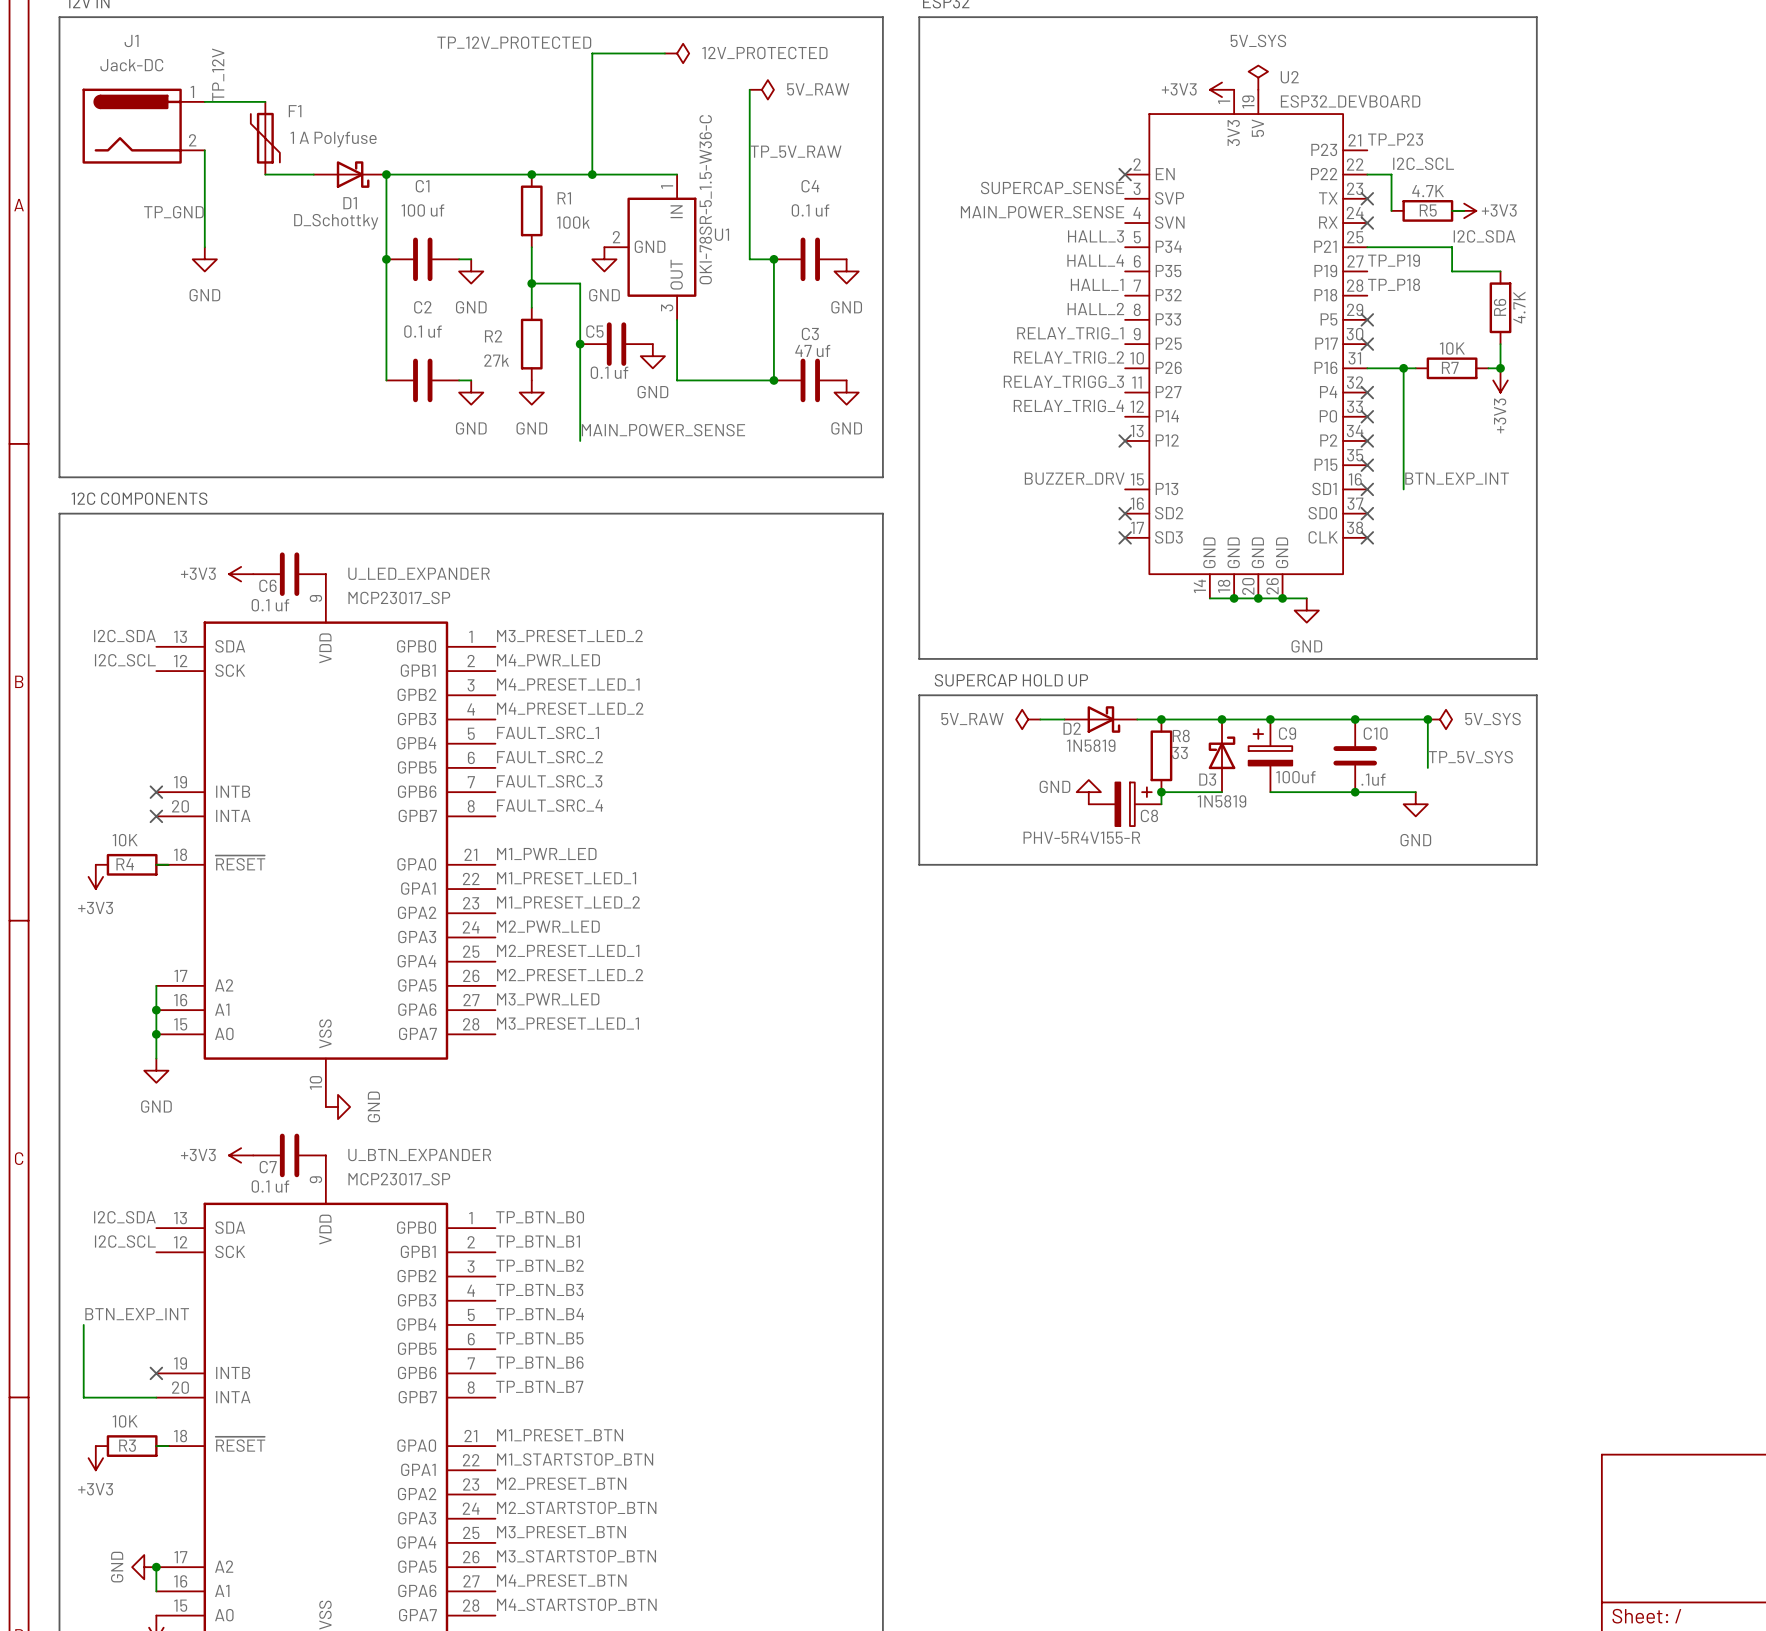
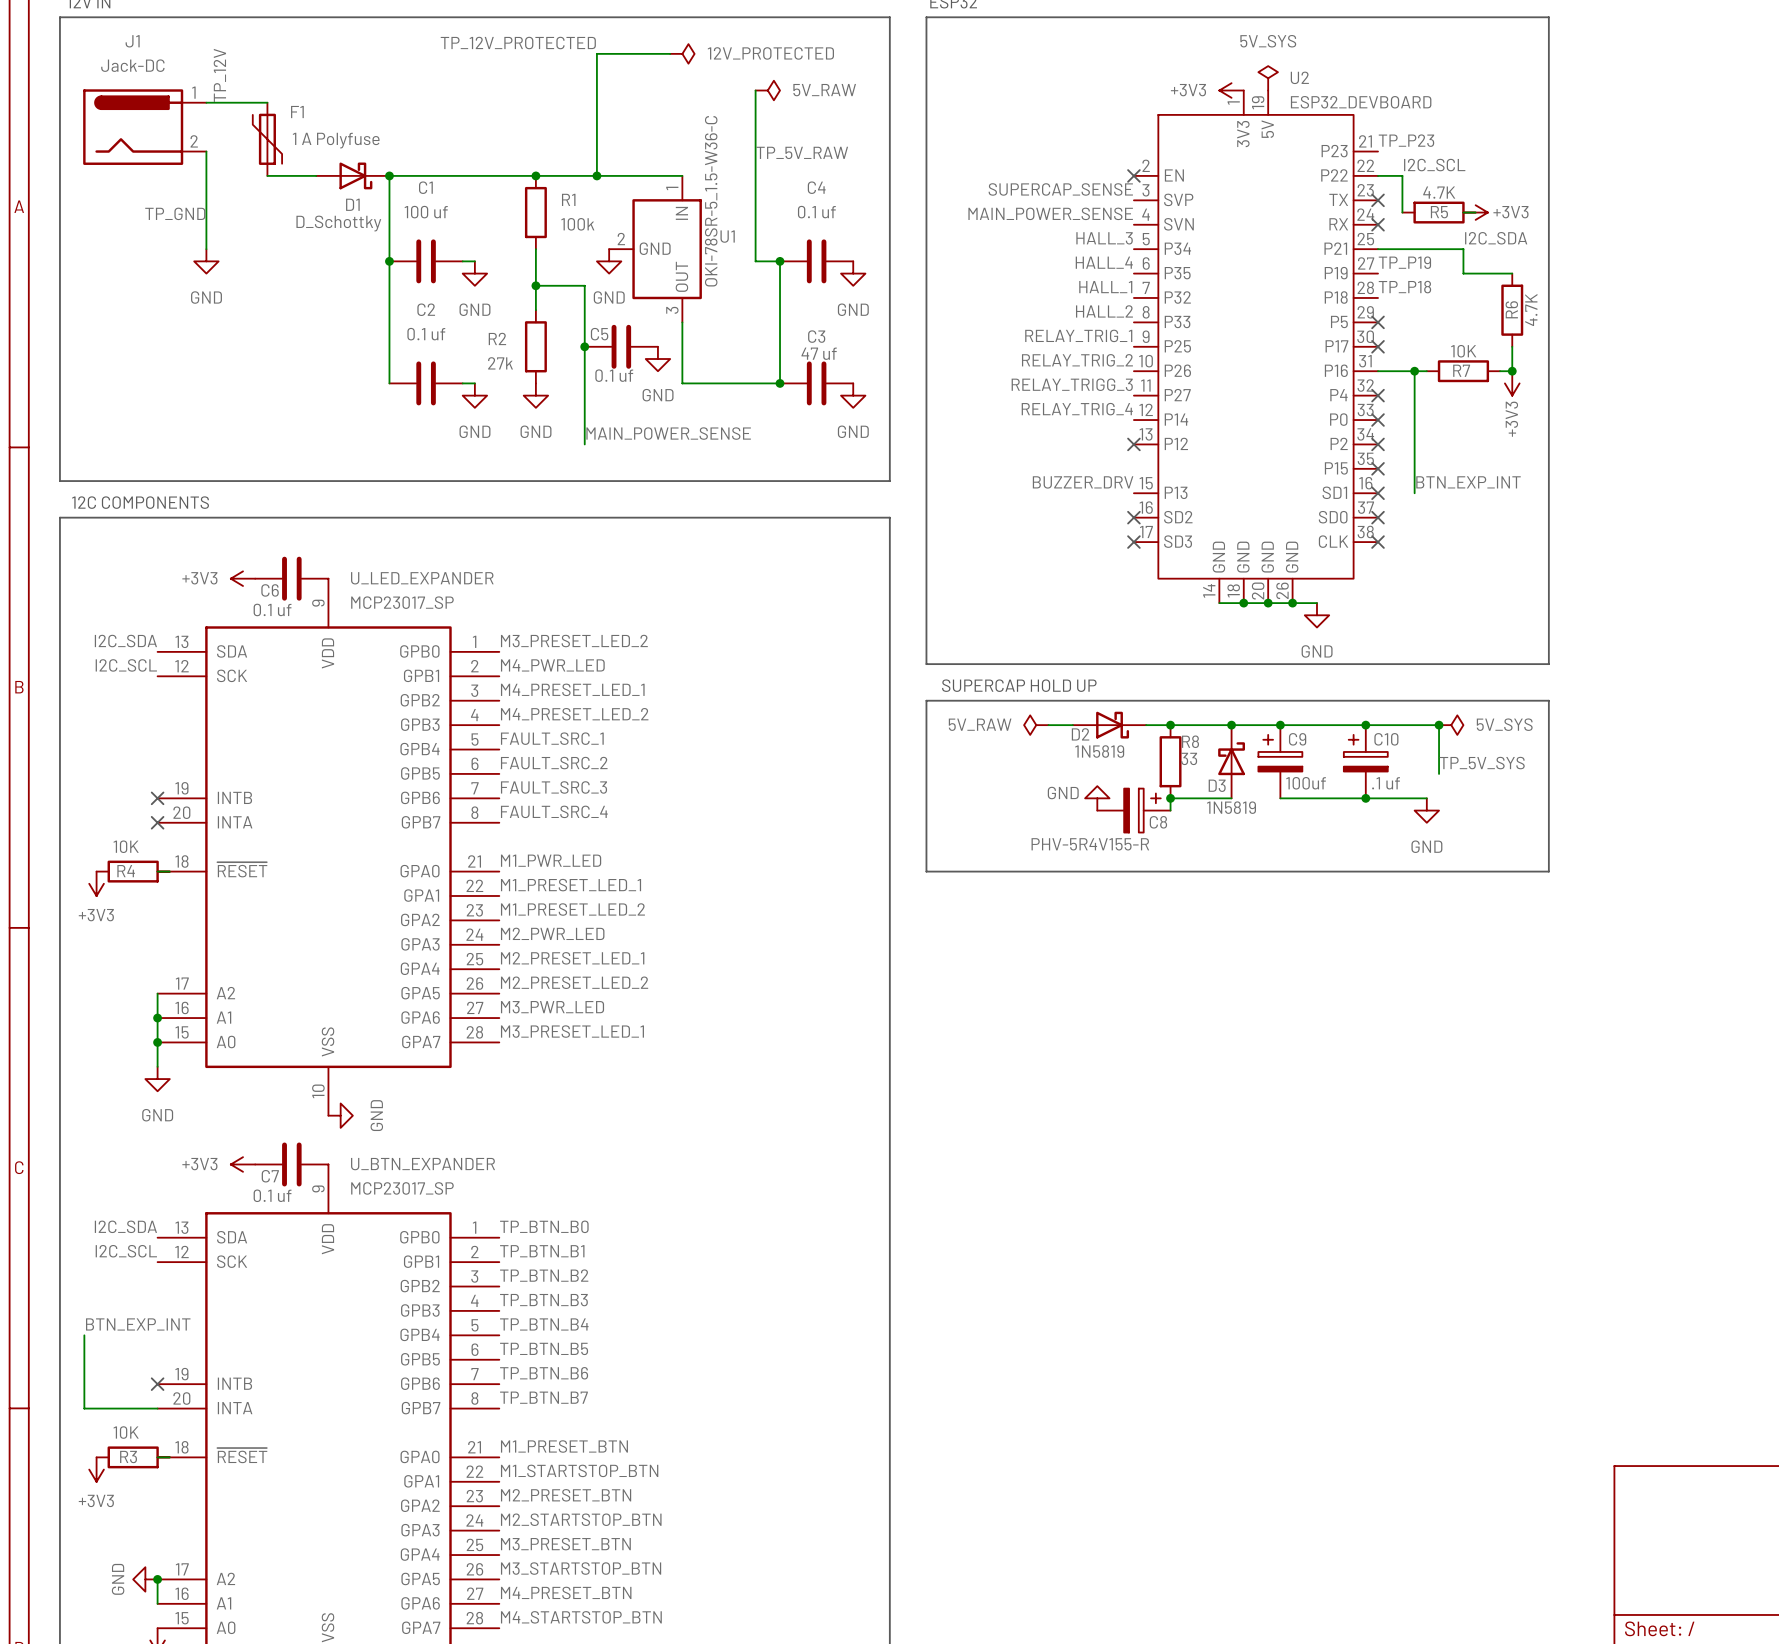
C10 symbol: [1333, 719, 1378, 793] -> [1343, 725, 1388, 799]
C10 value: .1uf (1373, 779) -> .1 uf (1386, 783)

